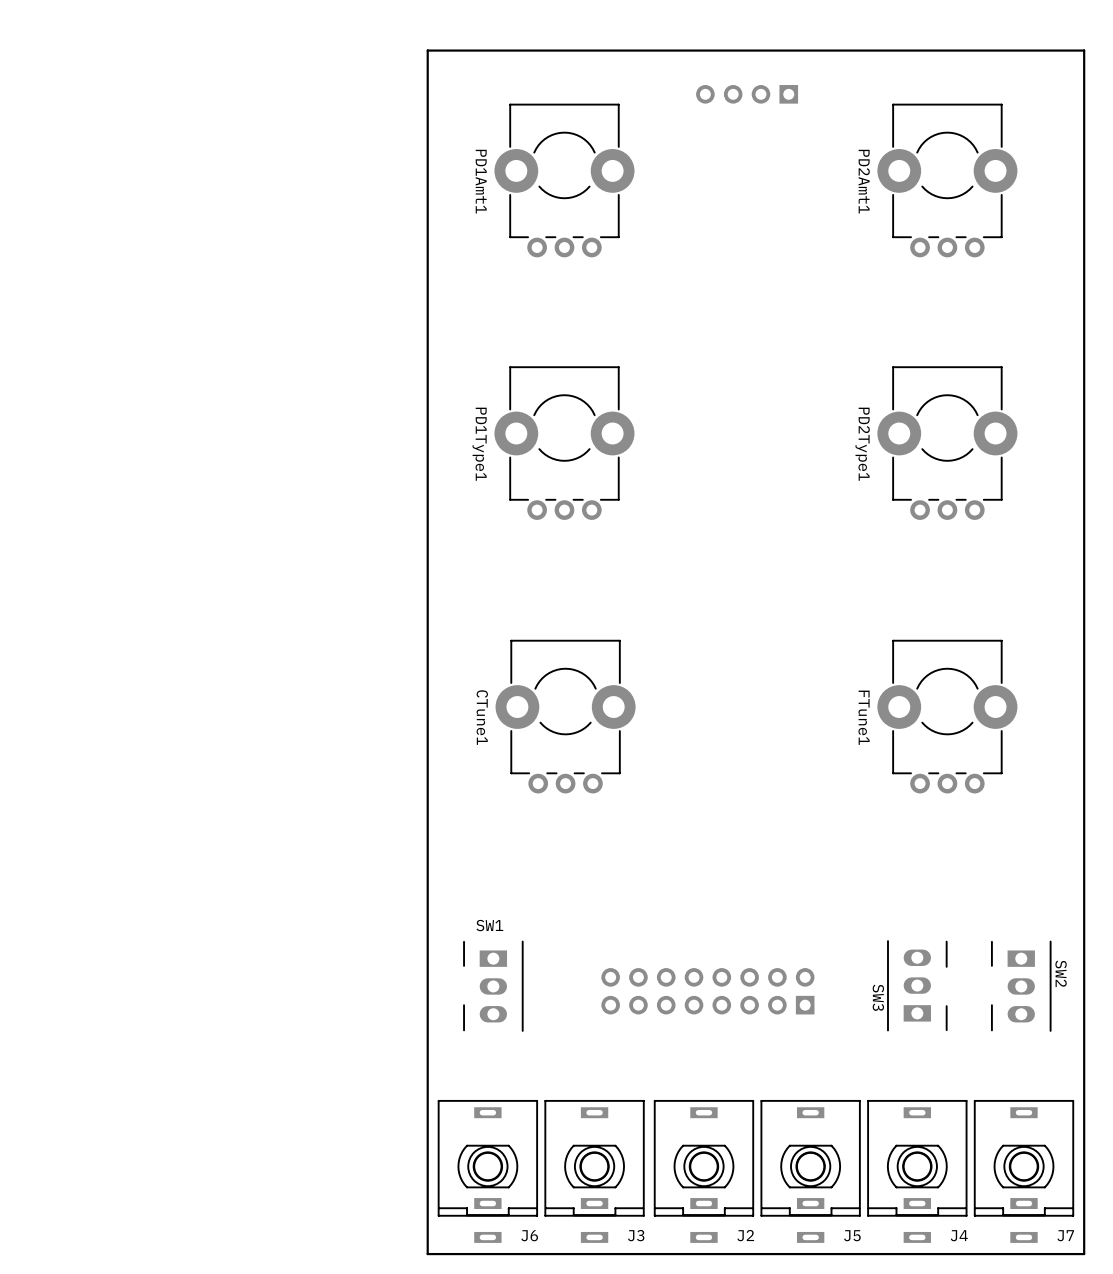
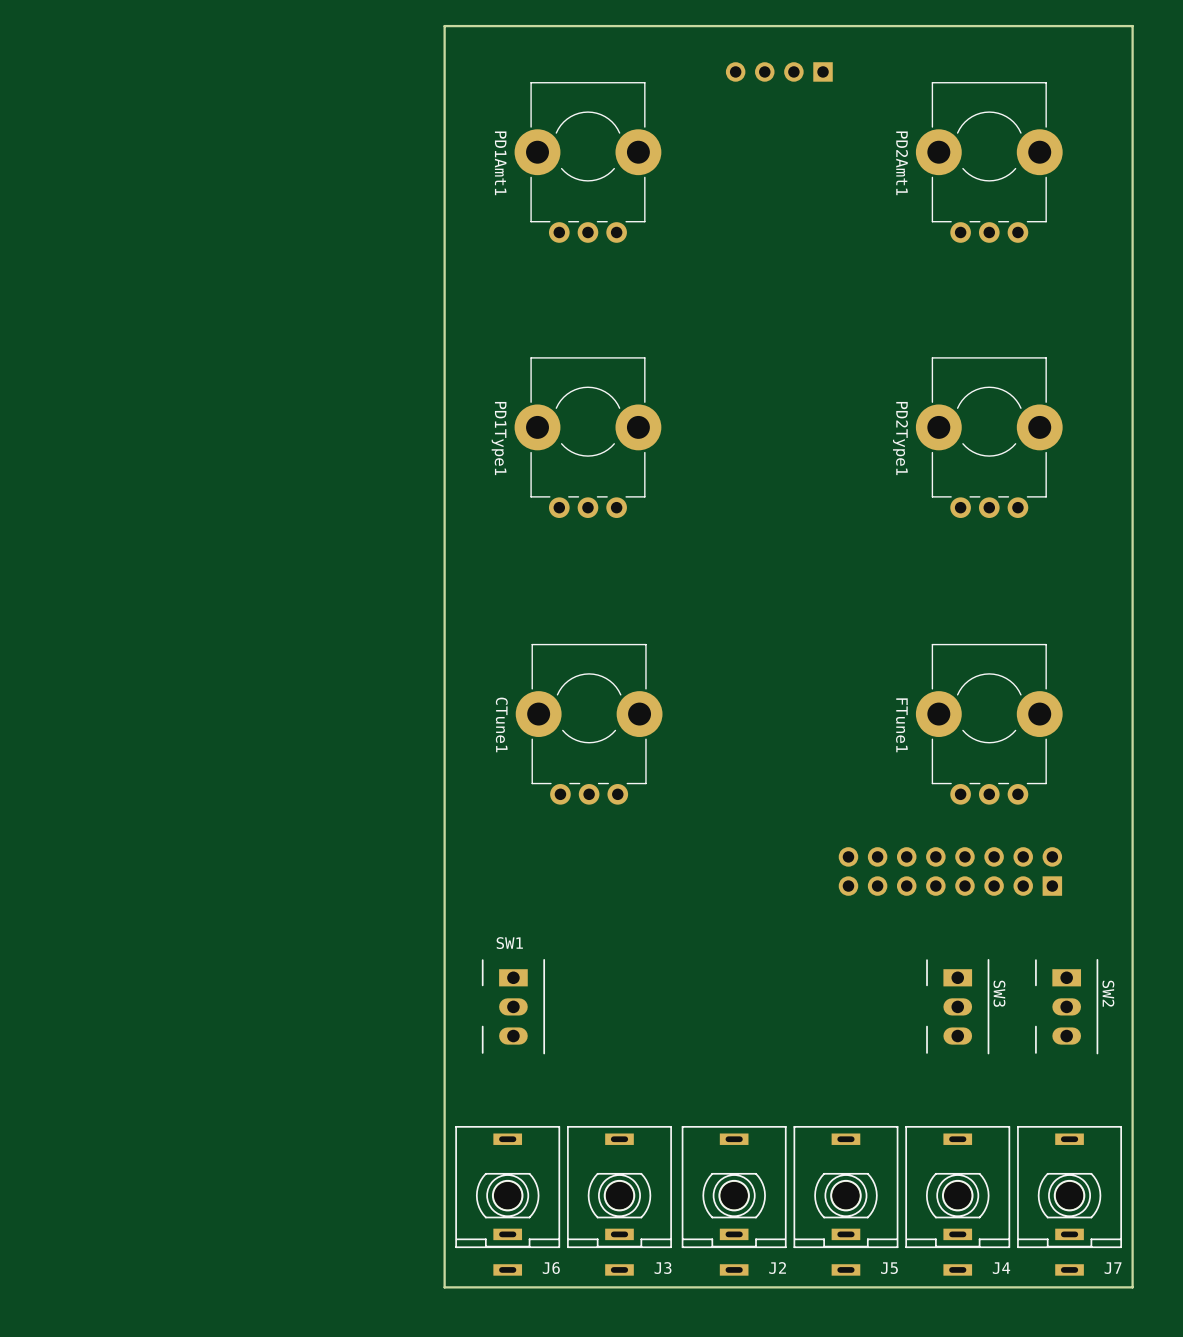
SW3 rotation: 0° (917, 985) -> 180° (957, 1006)
part position: (707, 991) -> (950, 871)

